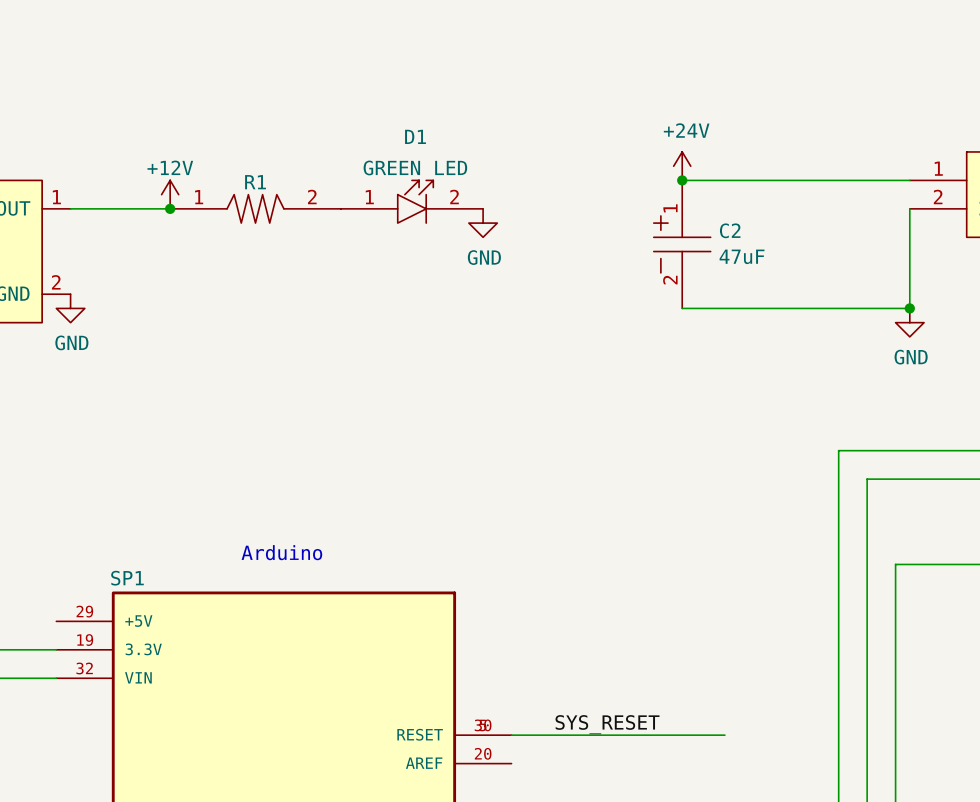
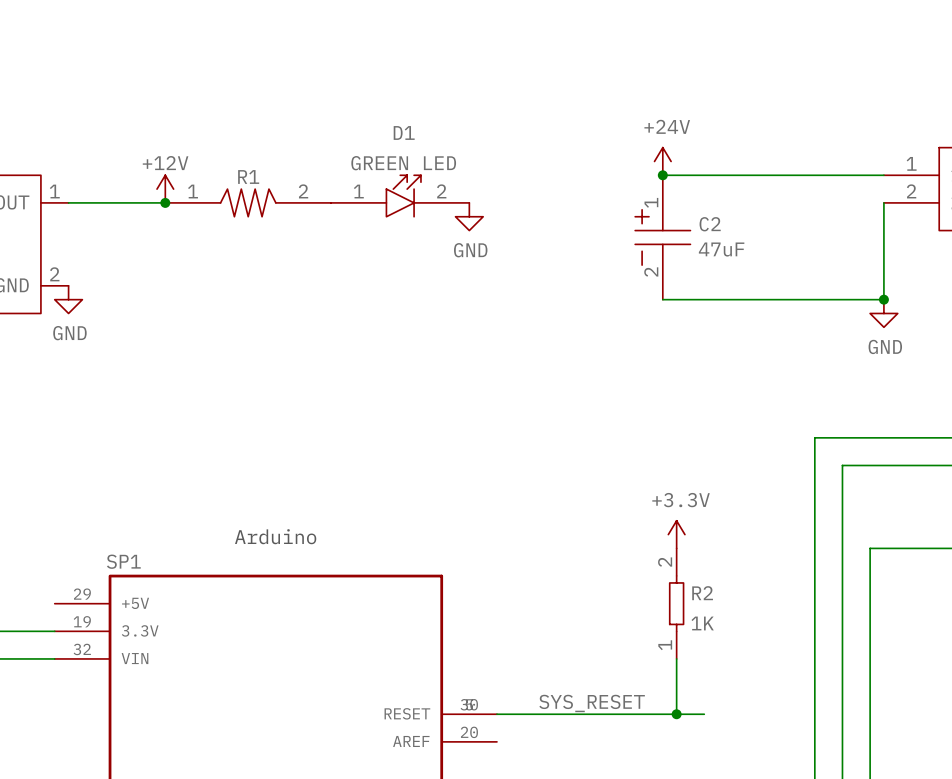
power symbol: none -> +3.3V (676, 534)
R2: none -> (676, 603)
wire: none -> (676, 658) (676, 714)
junction: none -> (676, 714)

